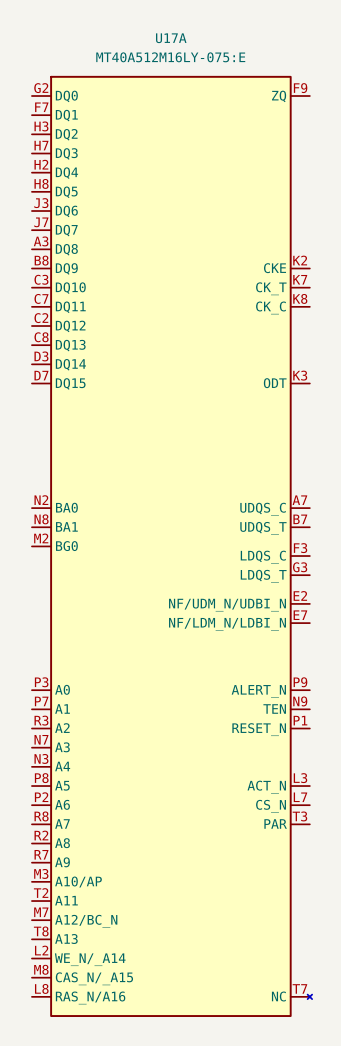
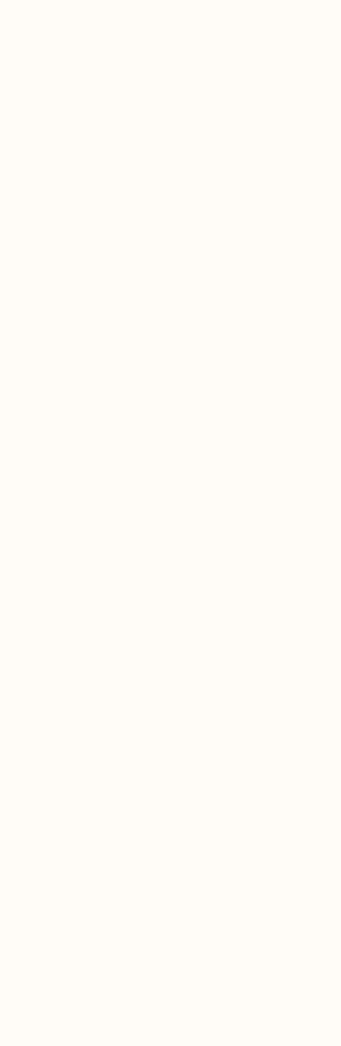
U17A: MT40A512M16LY-075:E (172, 546) -> none

